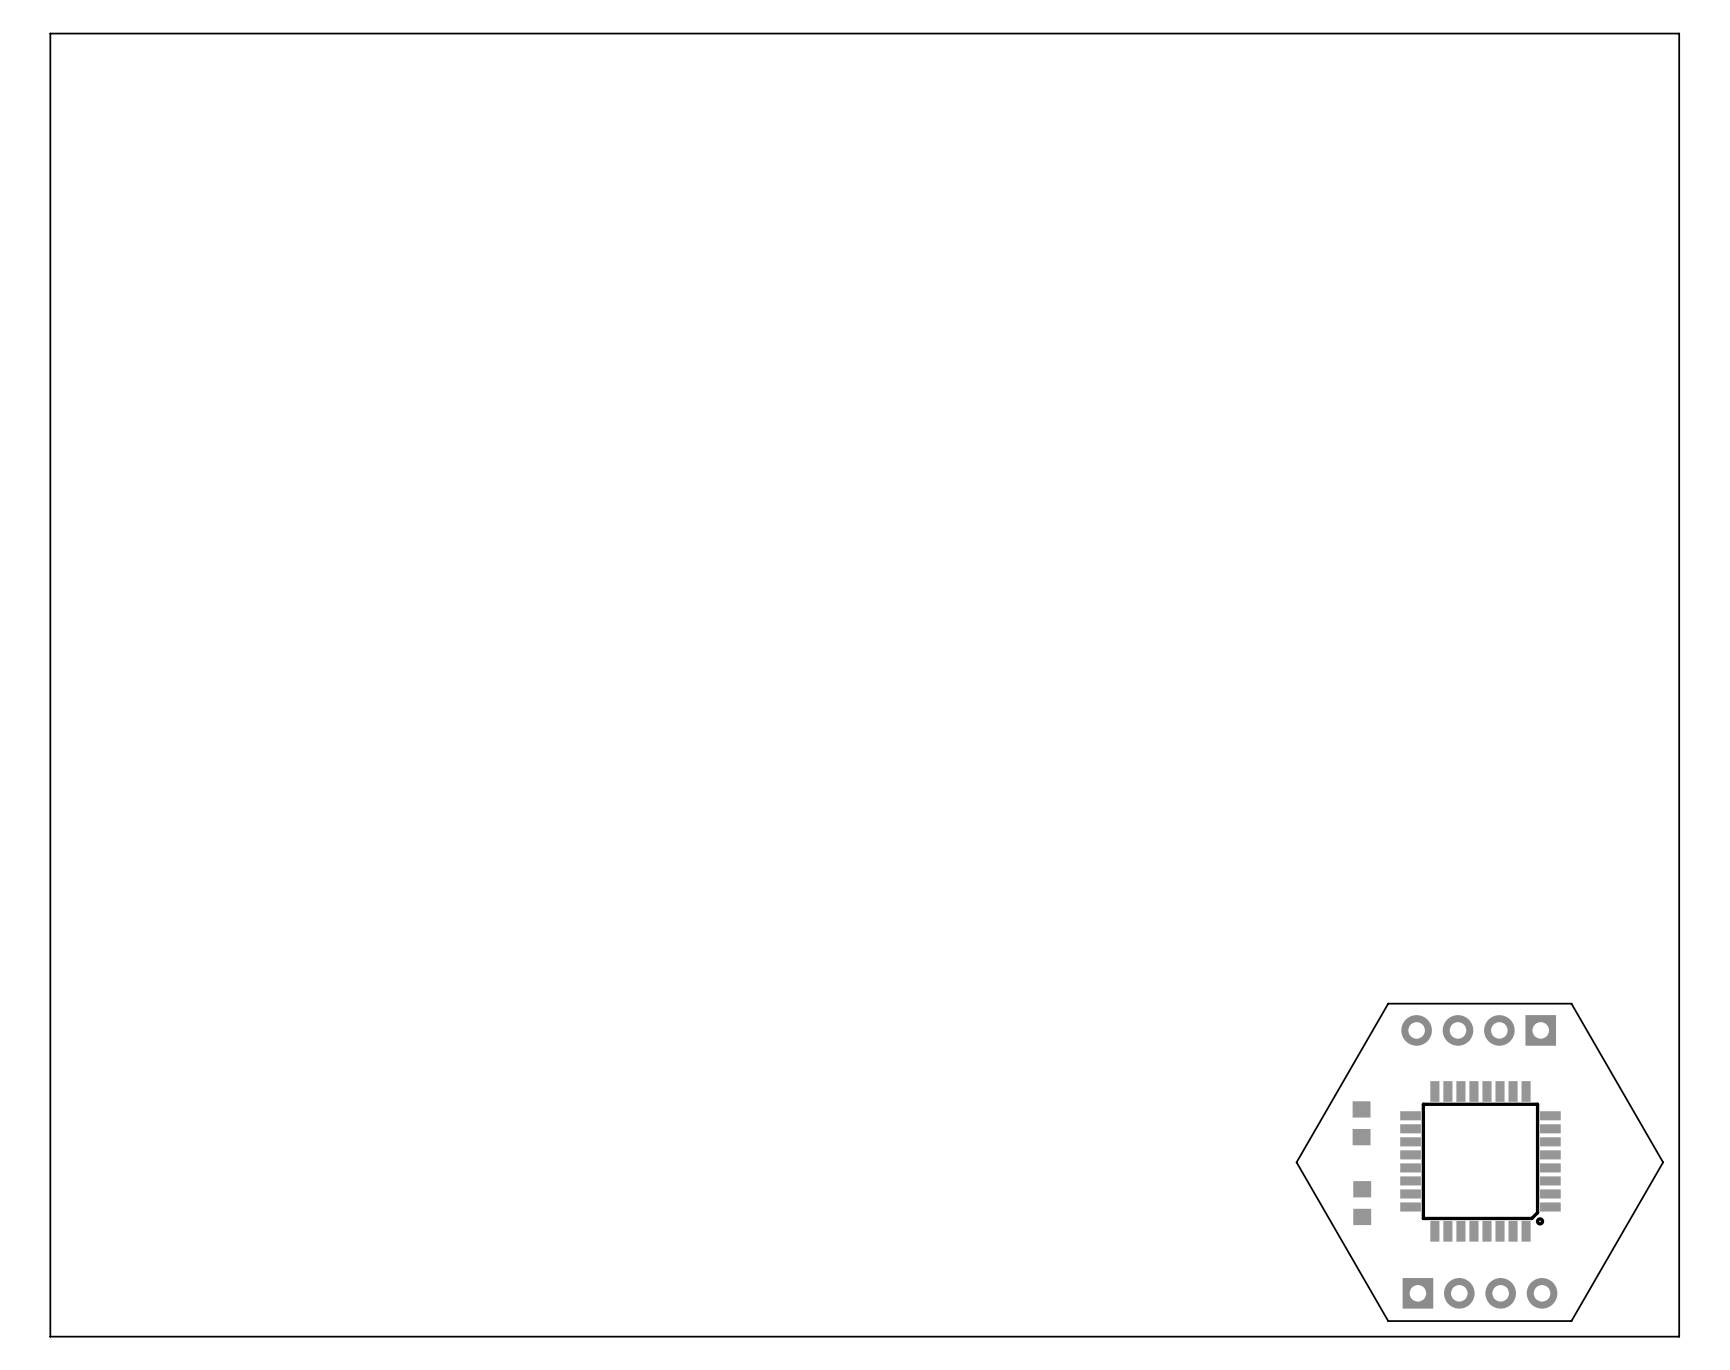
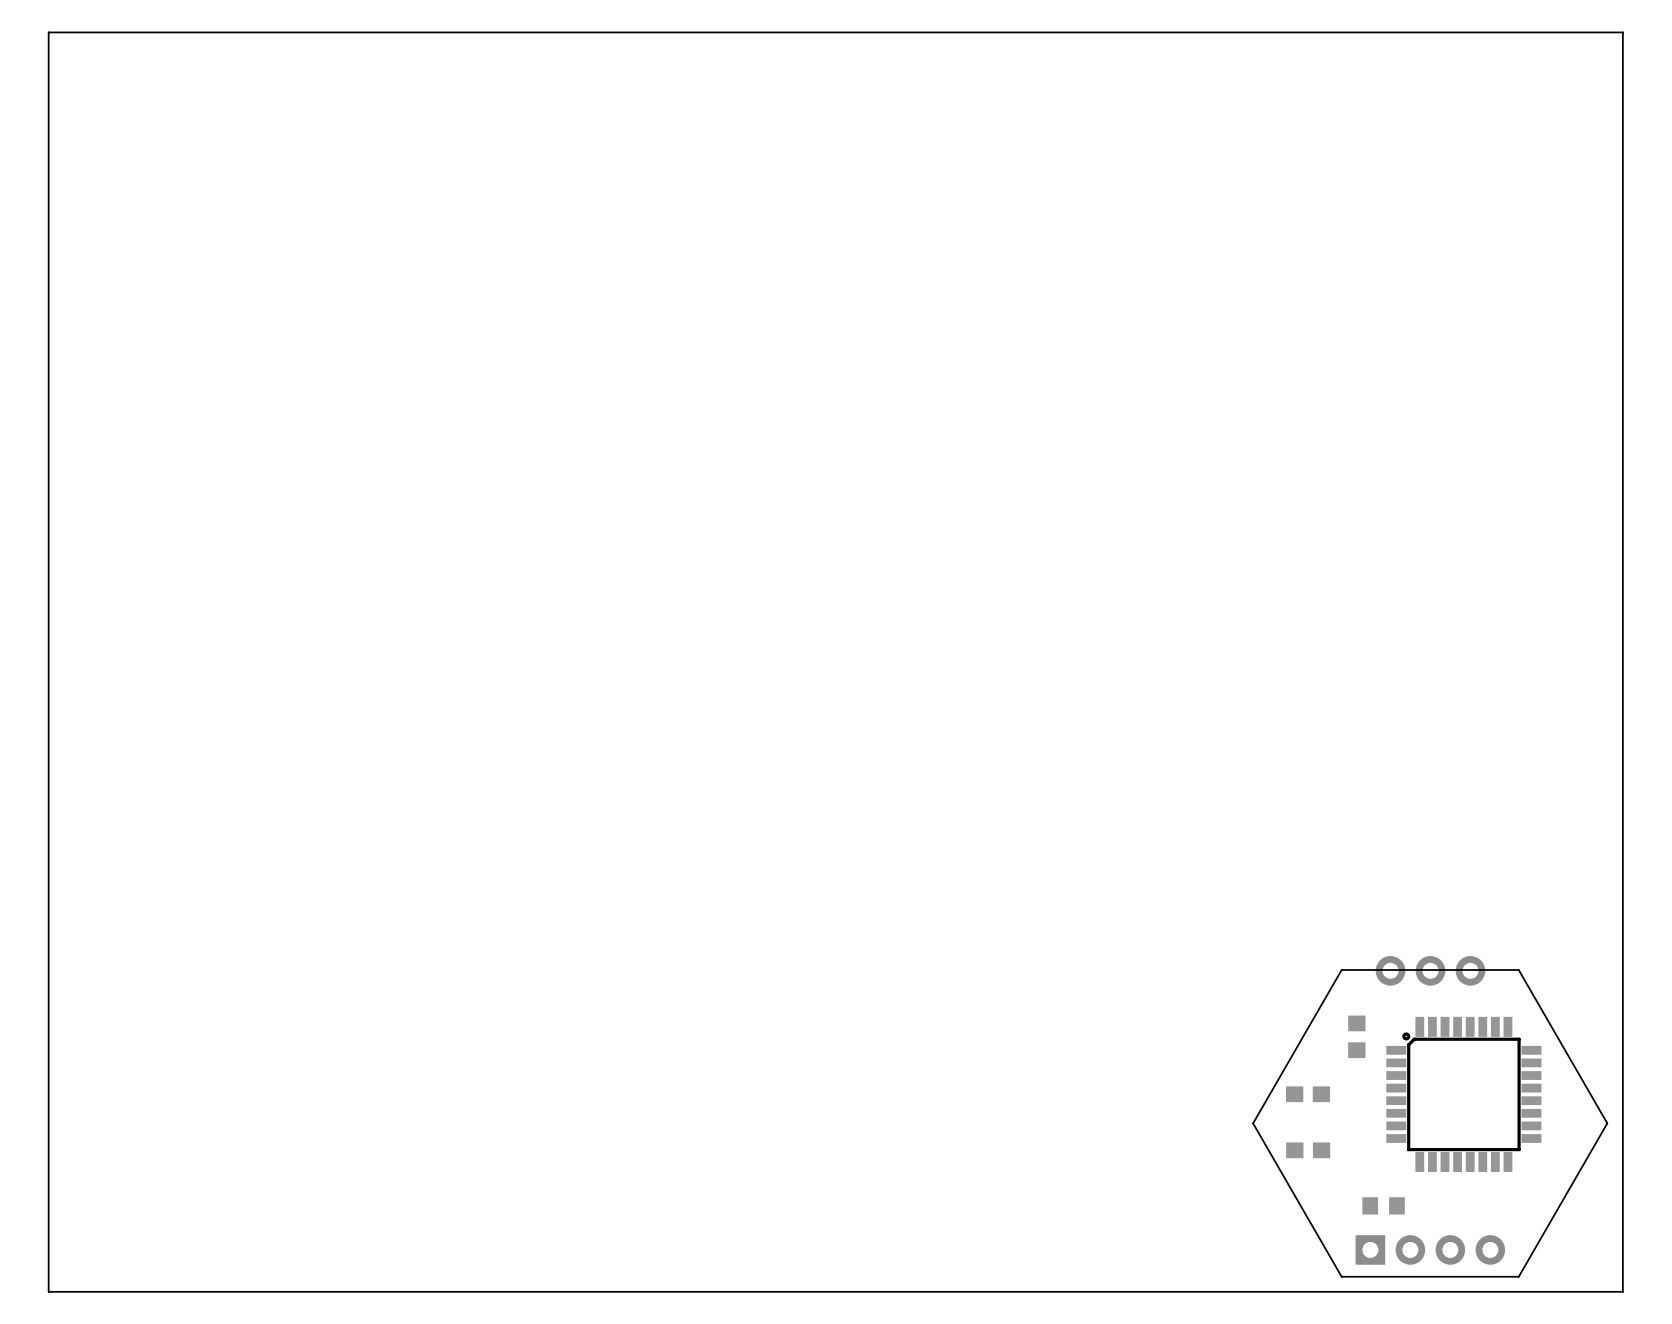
part: none -> (1430, 970)
part: (1478, 1030) -> none
part: none -> (1356, 1036)
part footprint: [1352, 1101, 1371, 1146] -> [1285, 1086, 1331, 1103]
part rotation: 0° (1480, 1161) -> 180° (1463, 1094)
part footprint: [1353, 1181, 1372, 1226] -> [1286, 1142, 1331, 1159]
part: none -> (1383, 1205)

